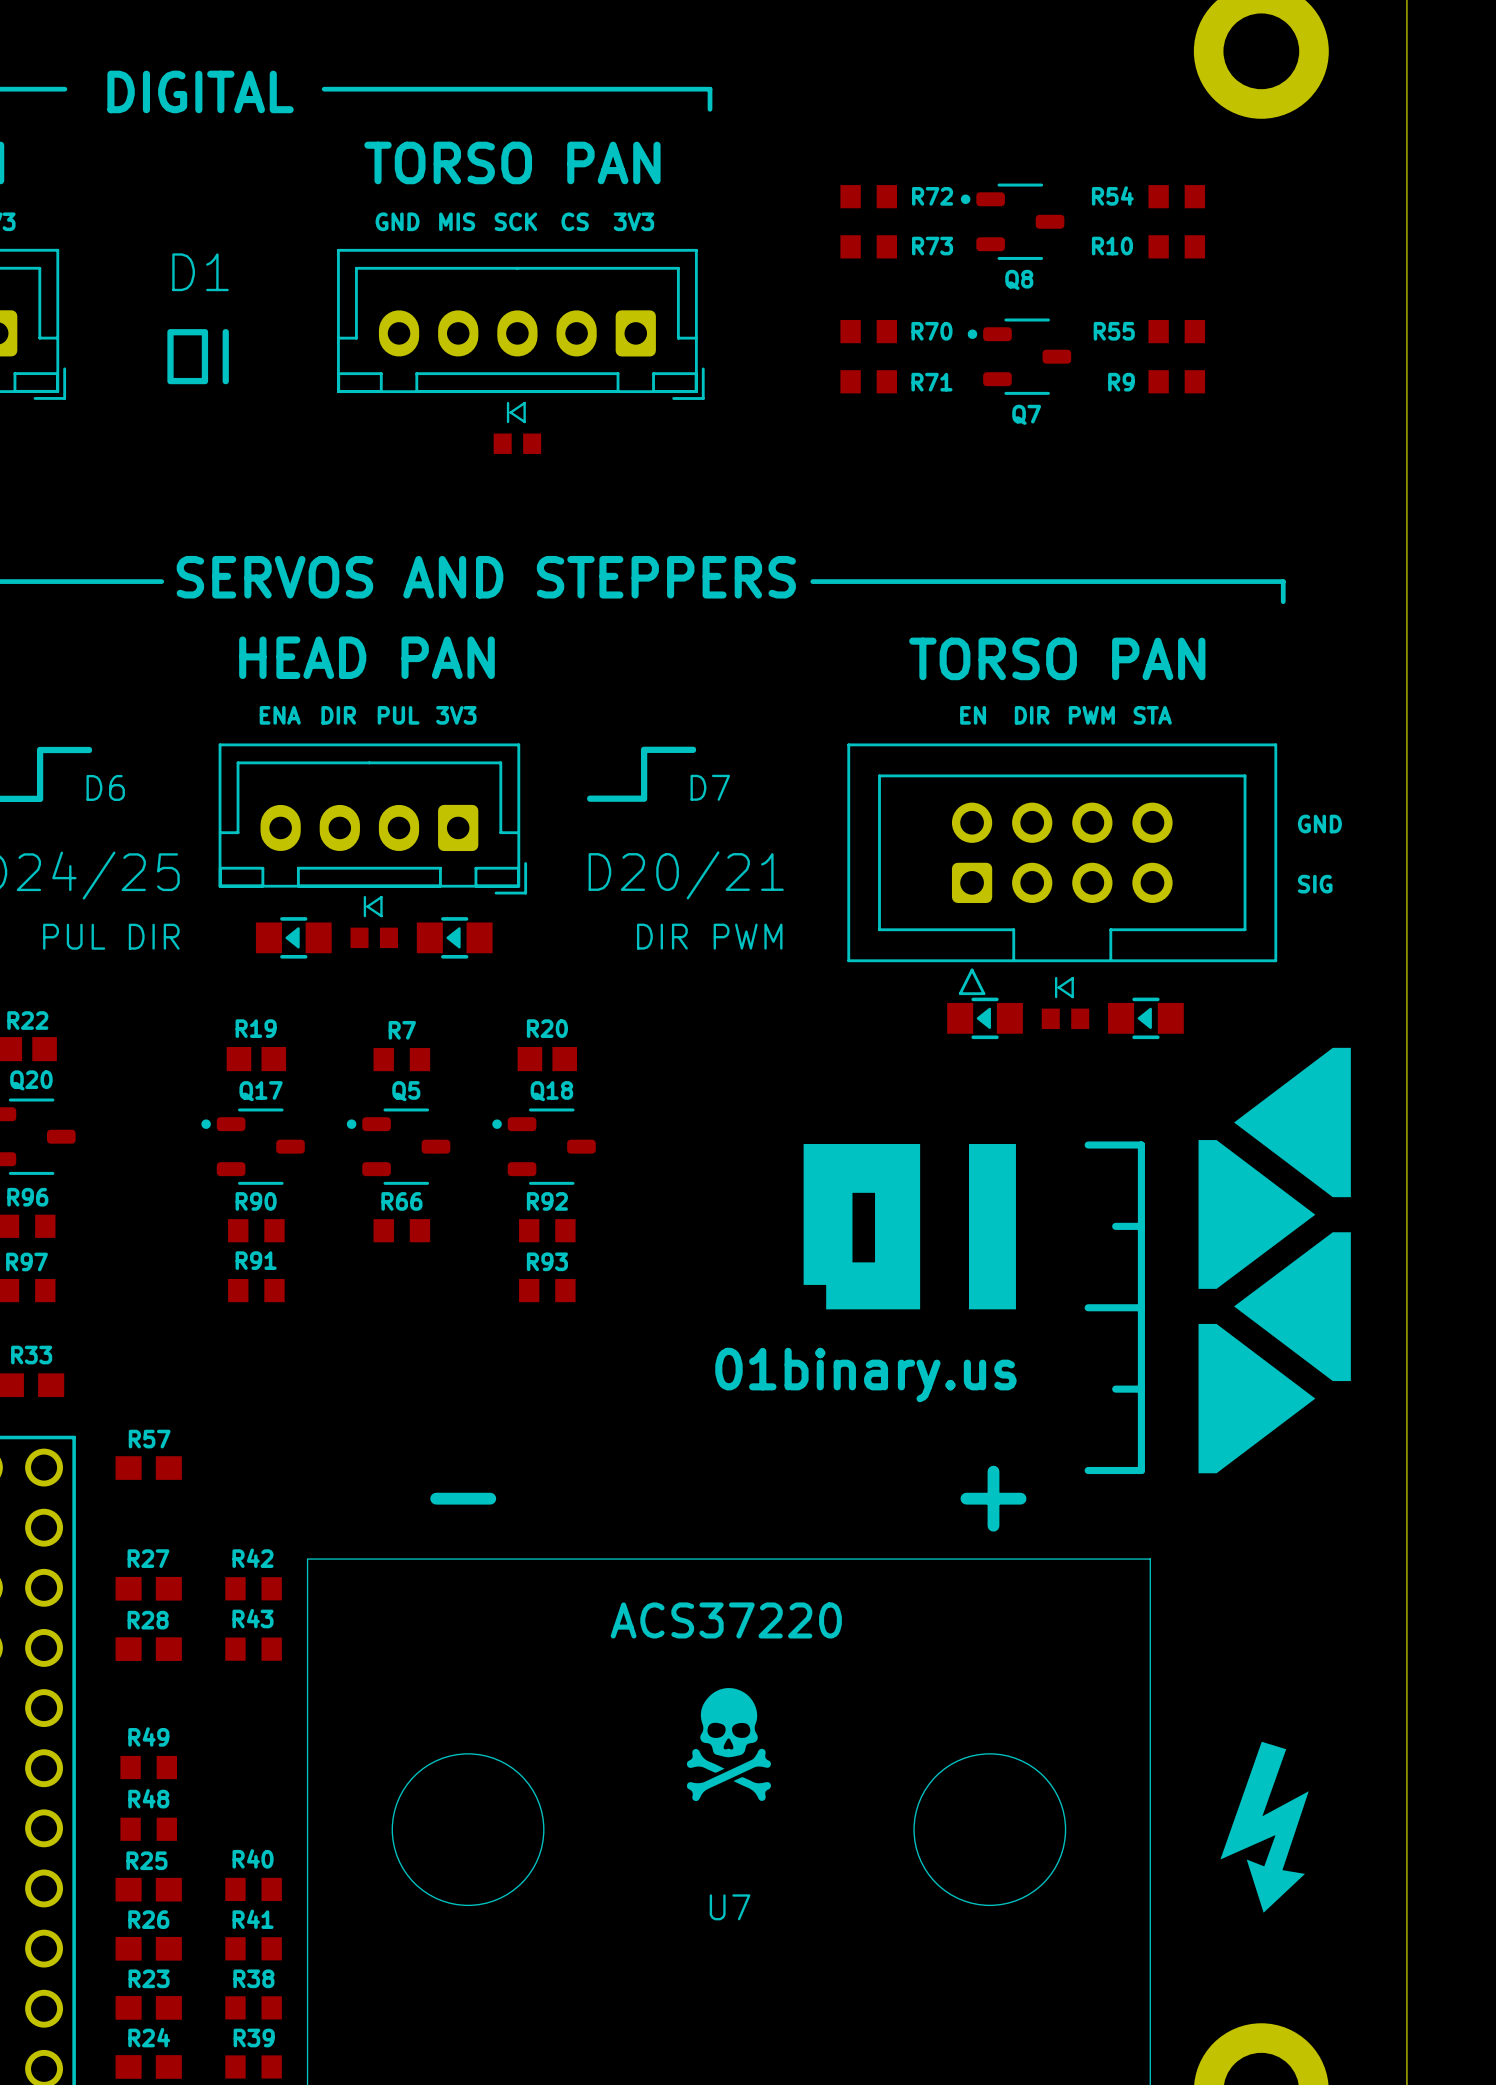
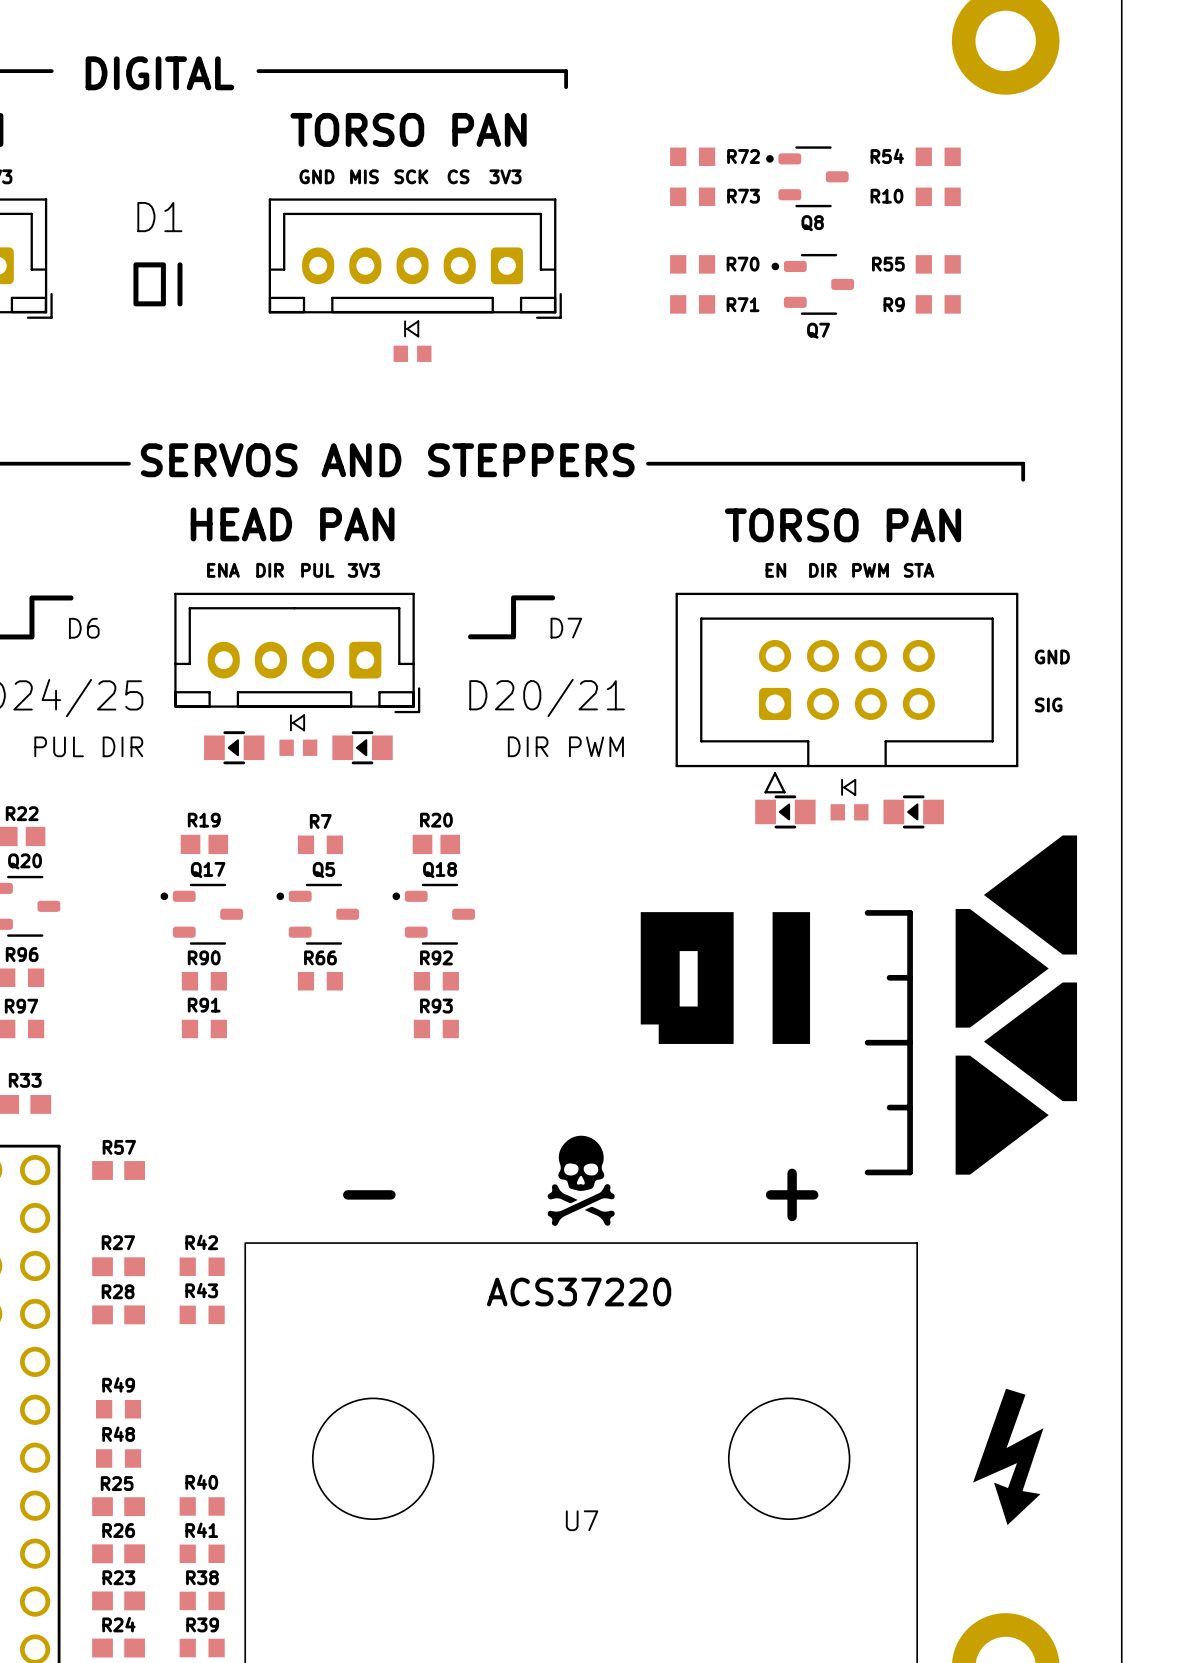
text: 01binary.us (865, 1375) -> none
drawing position: (729, 1722) -> (581, 1163)
drawing position: (705, 1760) -> (562, 1193)
drawing position: (728, 1774) -> (581, 1204)
drawing position: (752, 1789) -> (599, 1216)

